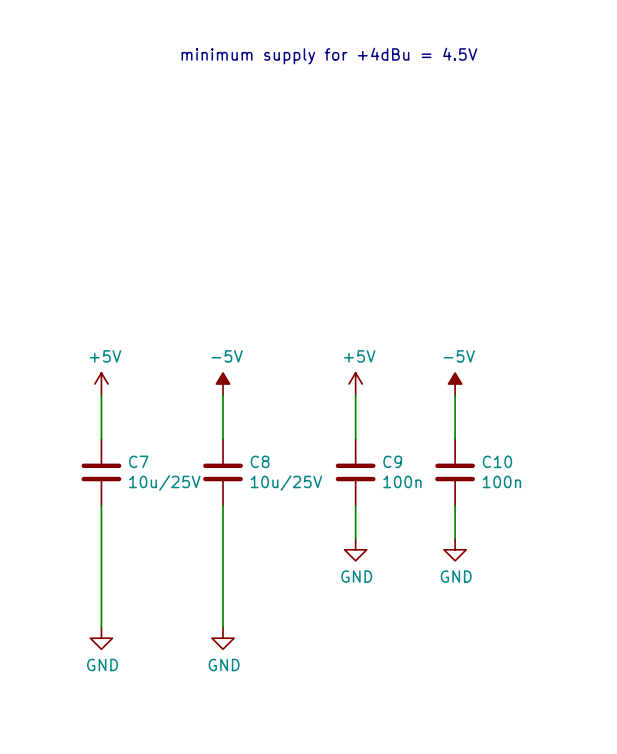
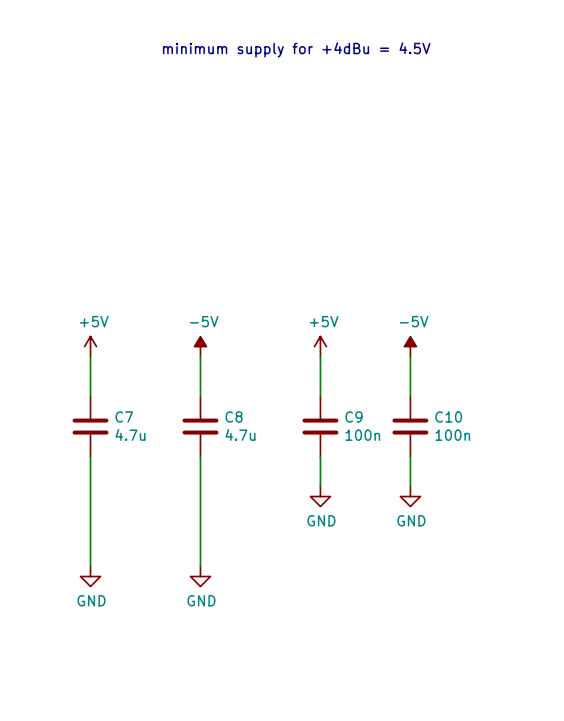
C7 value: 10u/25V (164, 483) -> 4.7u (130, 434)
C8 value: 10u/25V (286, 483) -> 4.7u (240, 434)

